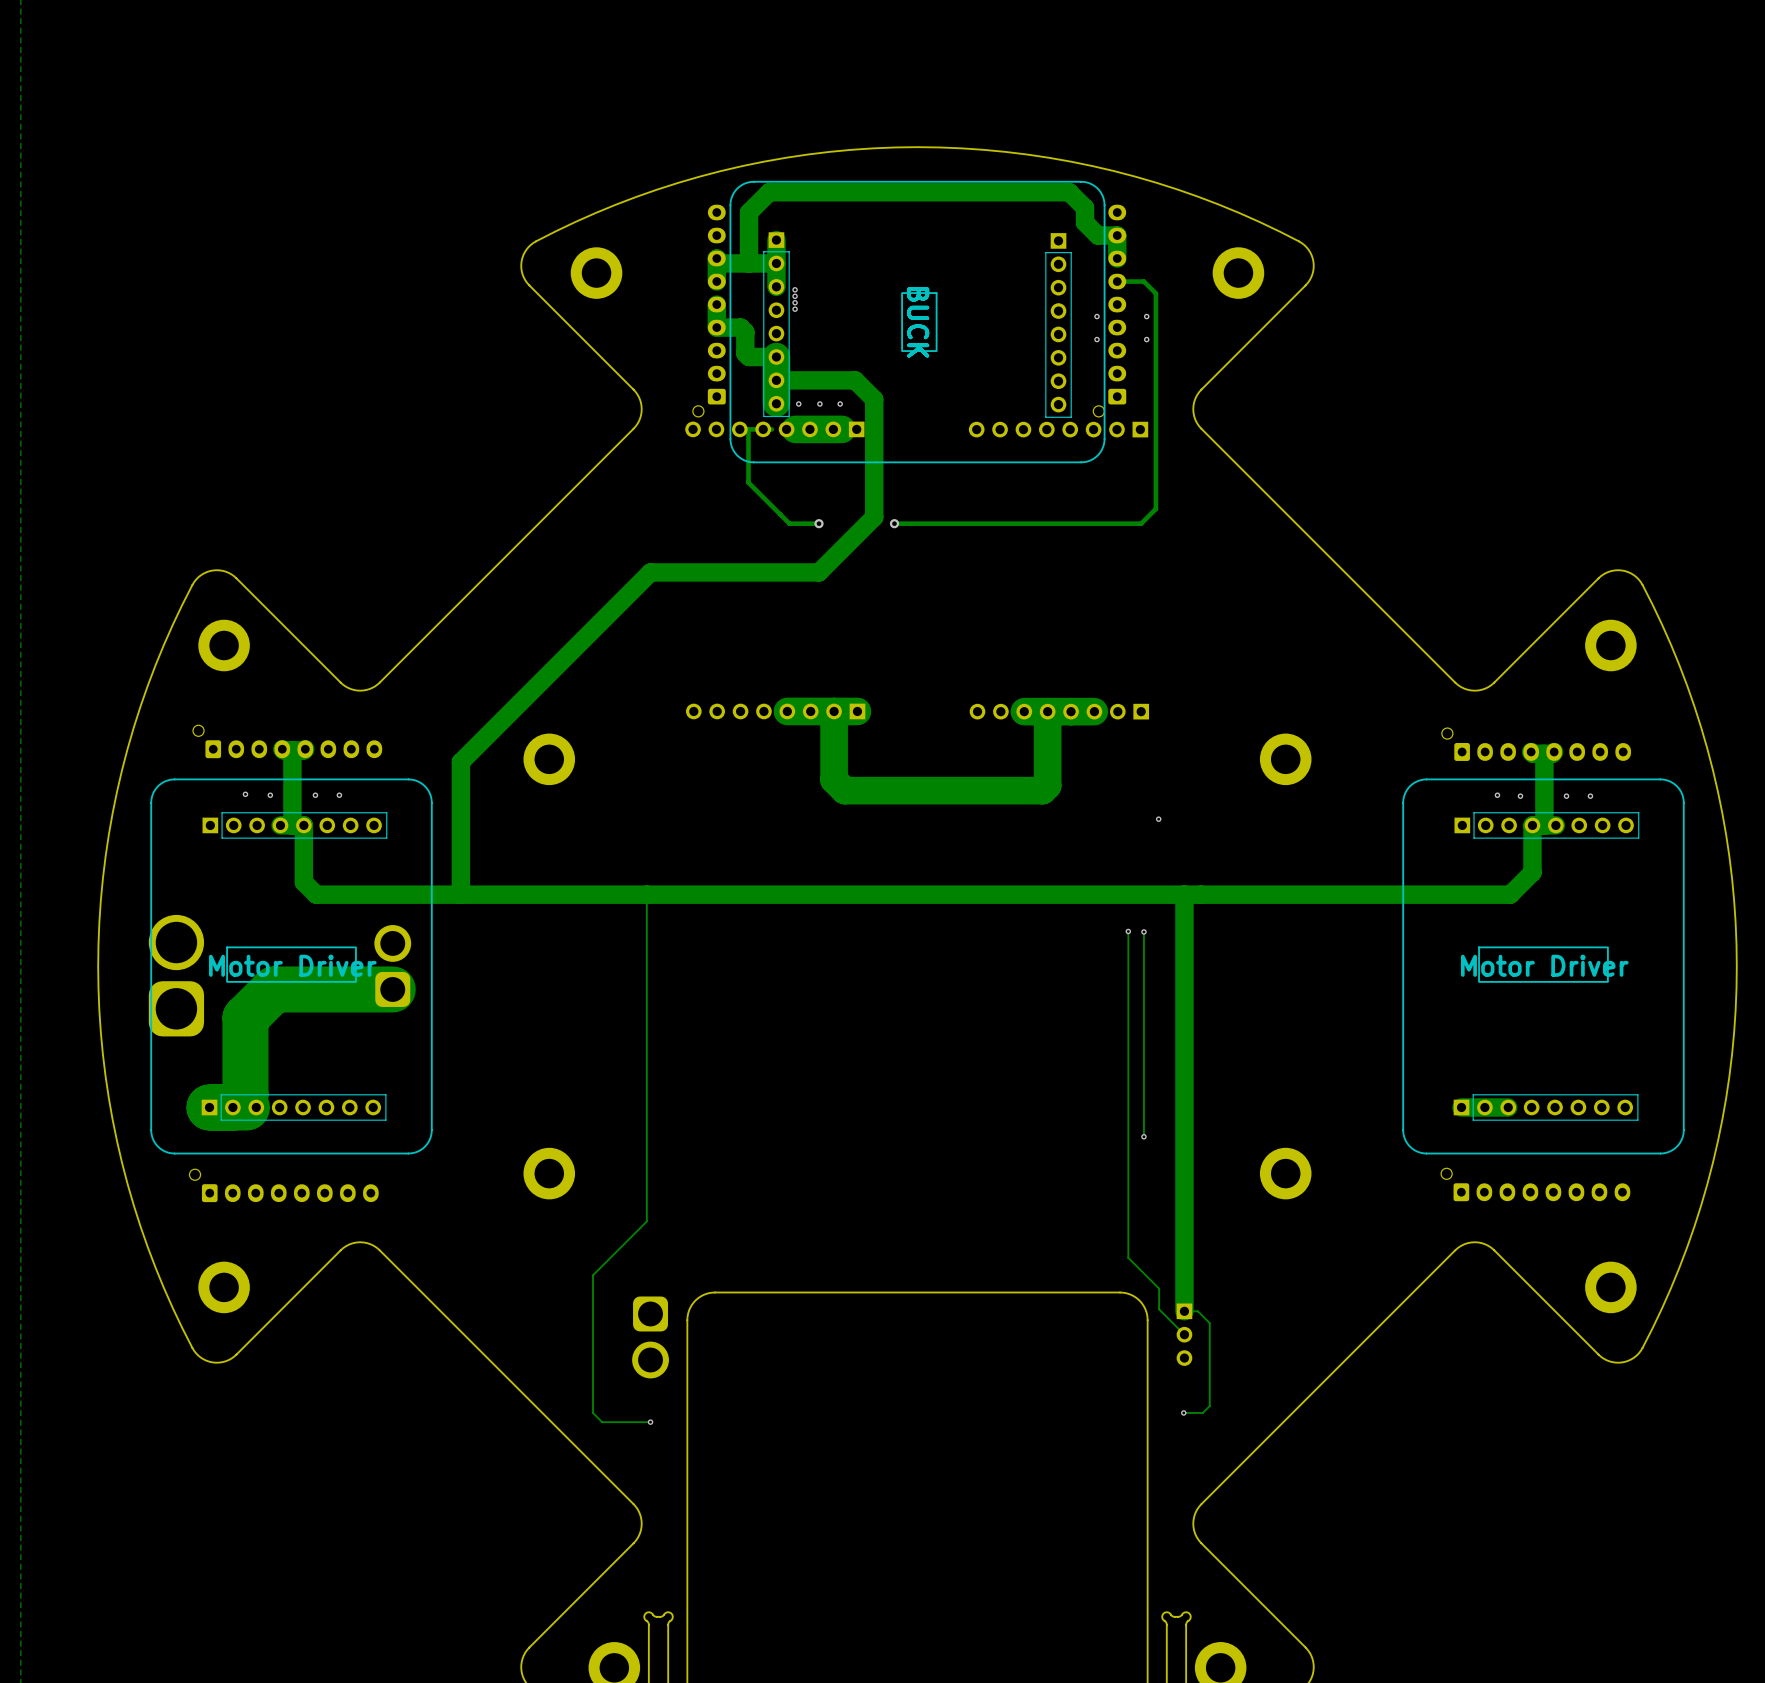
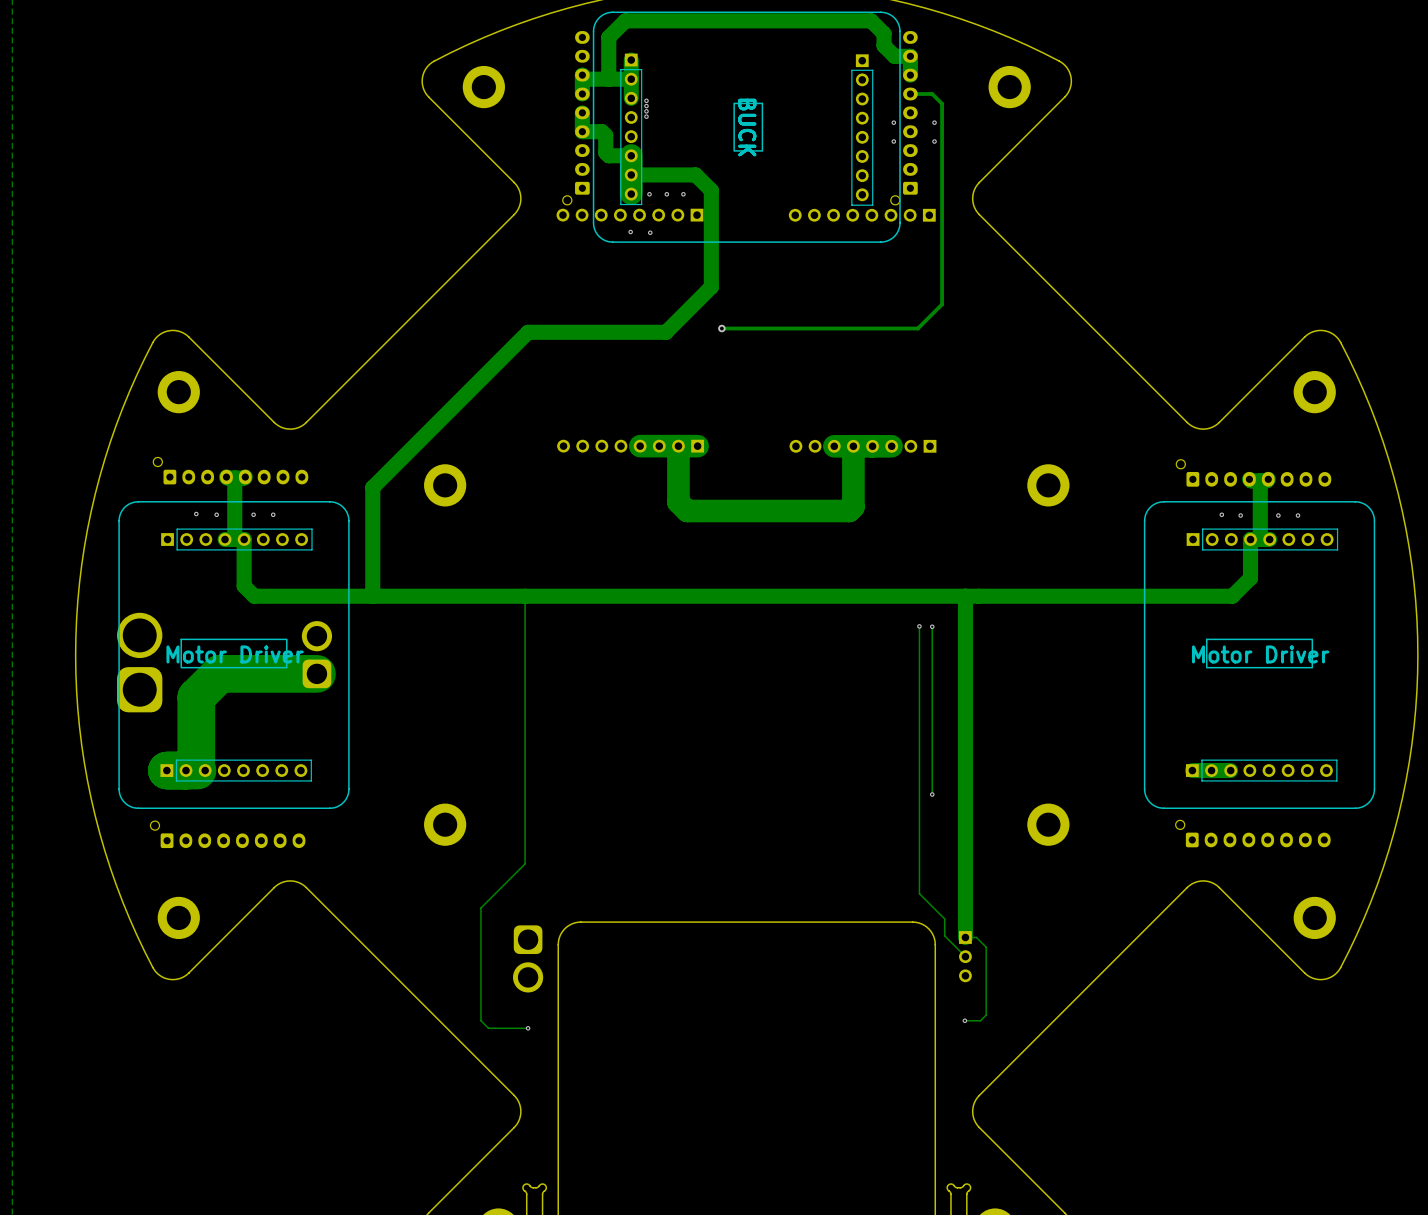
track: (771, 429) (748, 429) (748, 482) (789, 523) (820, 523) -> none
track: (842, 429) (795, 429) -> none
via: none -> (630, 232)
via: none -> (650, 232)
track: (1155, 508) (1141, 523) (894, 523) -> (942, 280) (942, 304) (917, 328) (721, 328)
via: (818, 523) -> none
via: (894, 523) -> none
via: none -> (721, 328)
via: (1158, 819) -> none

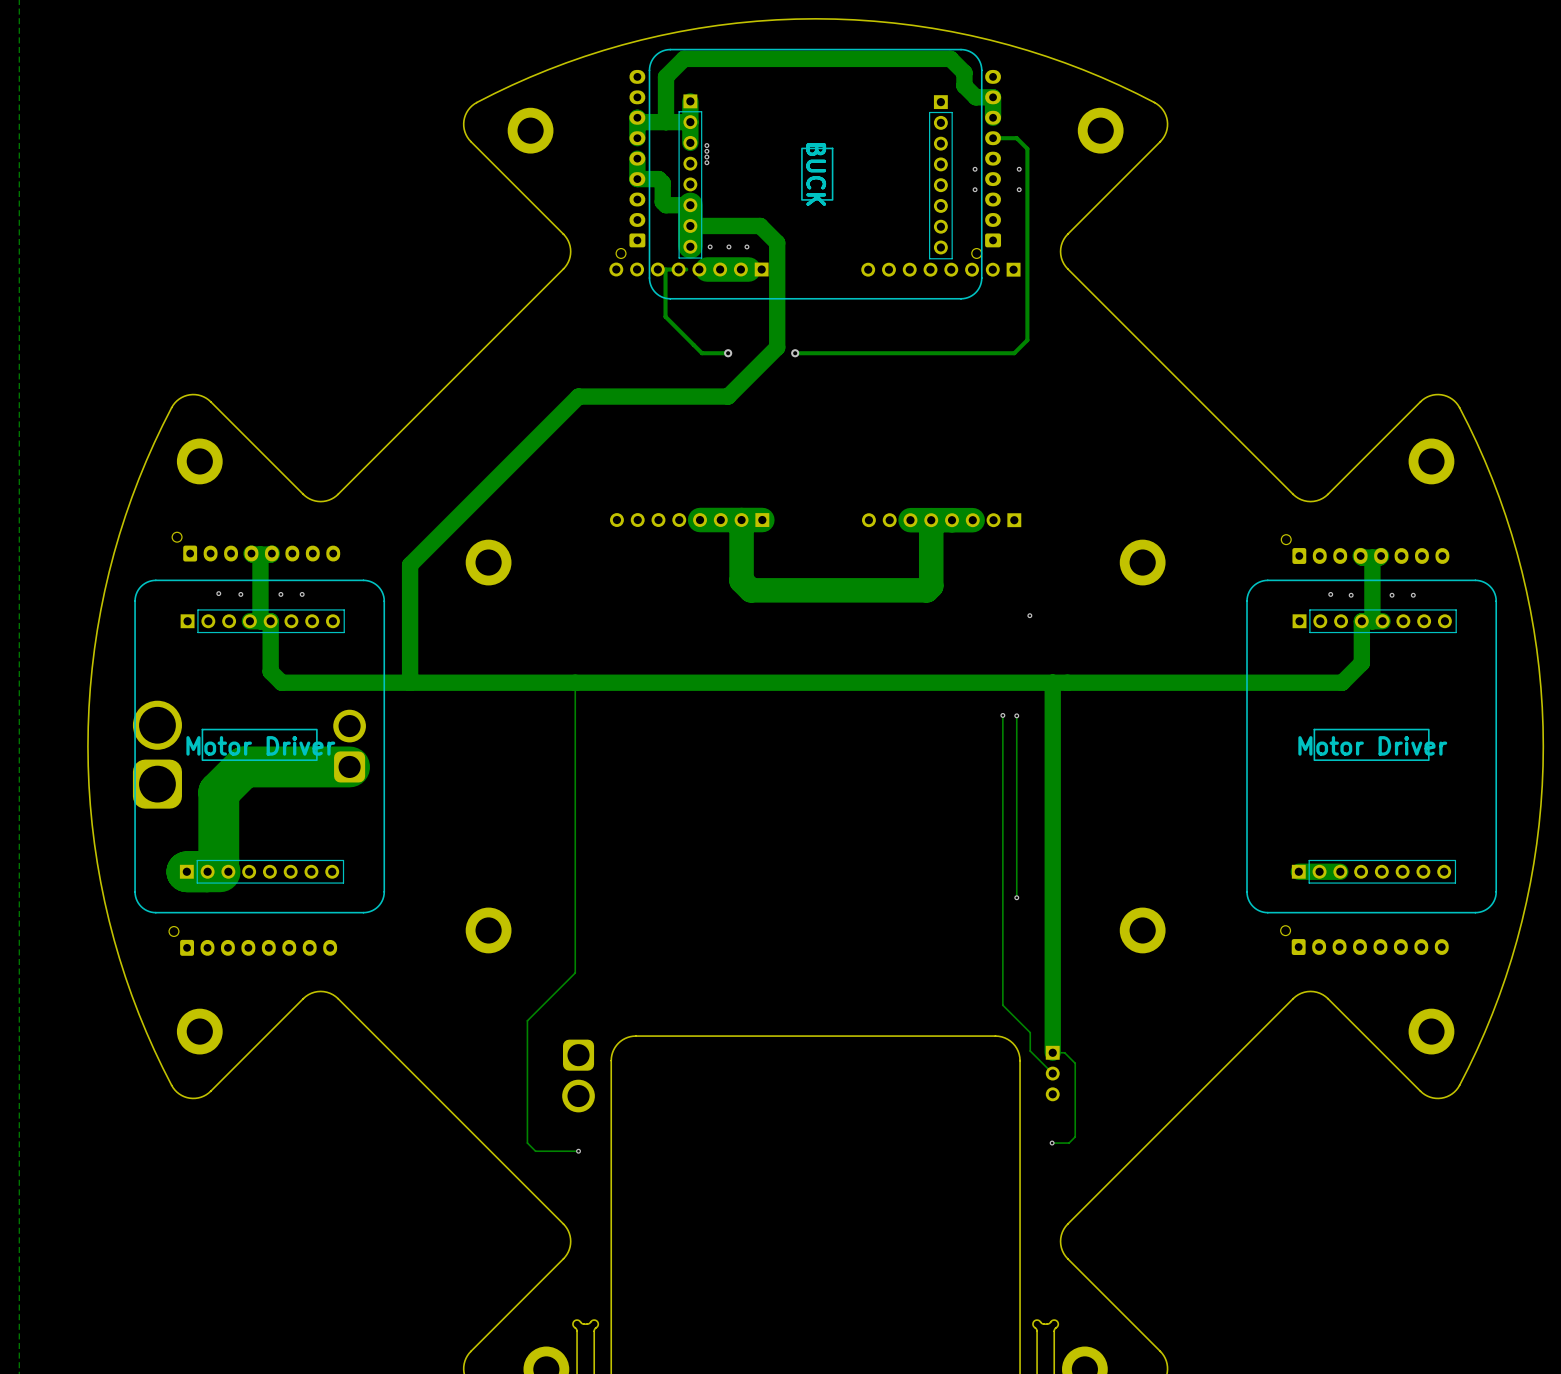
track: none -> (686, 269) (665, 269) (665, 316) (701, 353) (729, 353)
track: none -> (748, 269) (707, 269)
via: (630, 232) -> none
via: (650, 232) -> none
track: (942, 280) (942, 304) (917, 328) (721, 328) -> (1027, 340) (1014, 353) (795, 353)
via: none -> (728, 353)
via: none -> (795, 353)
via: (721, 328) -> none
via: none -> (1029, 615)

